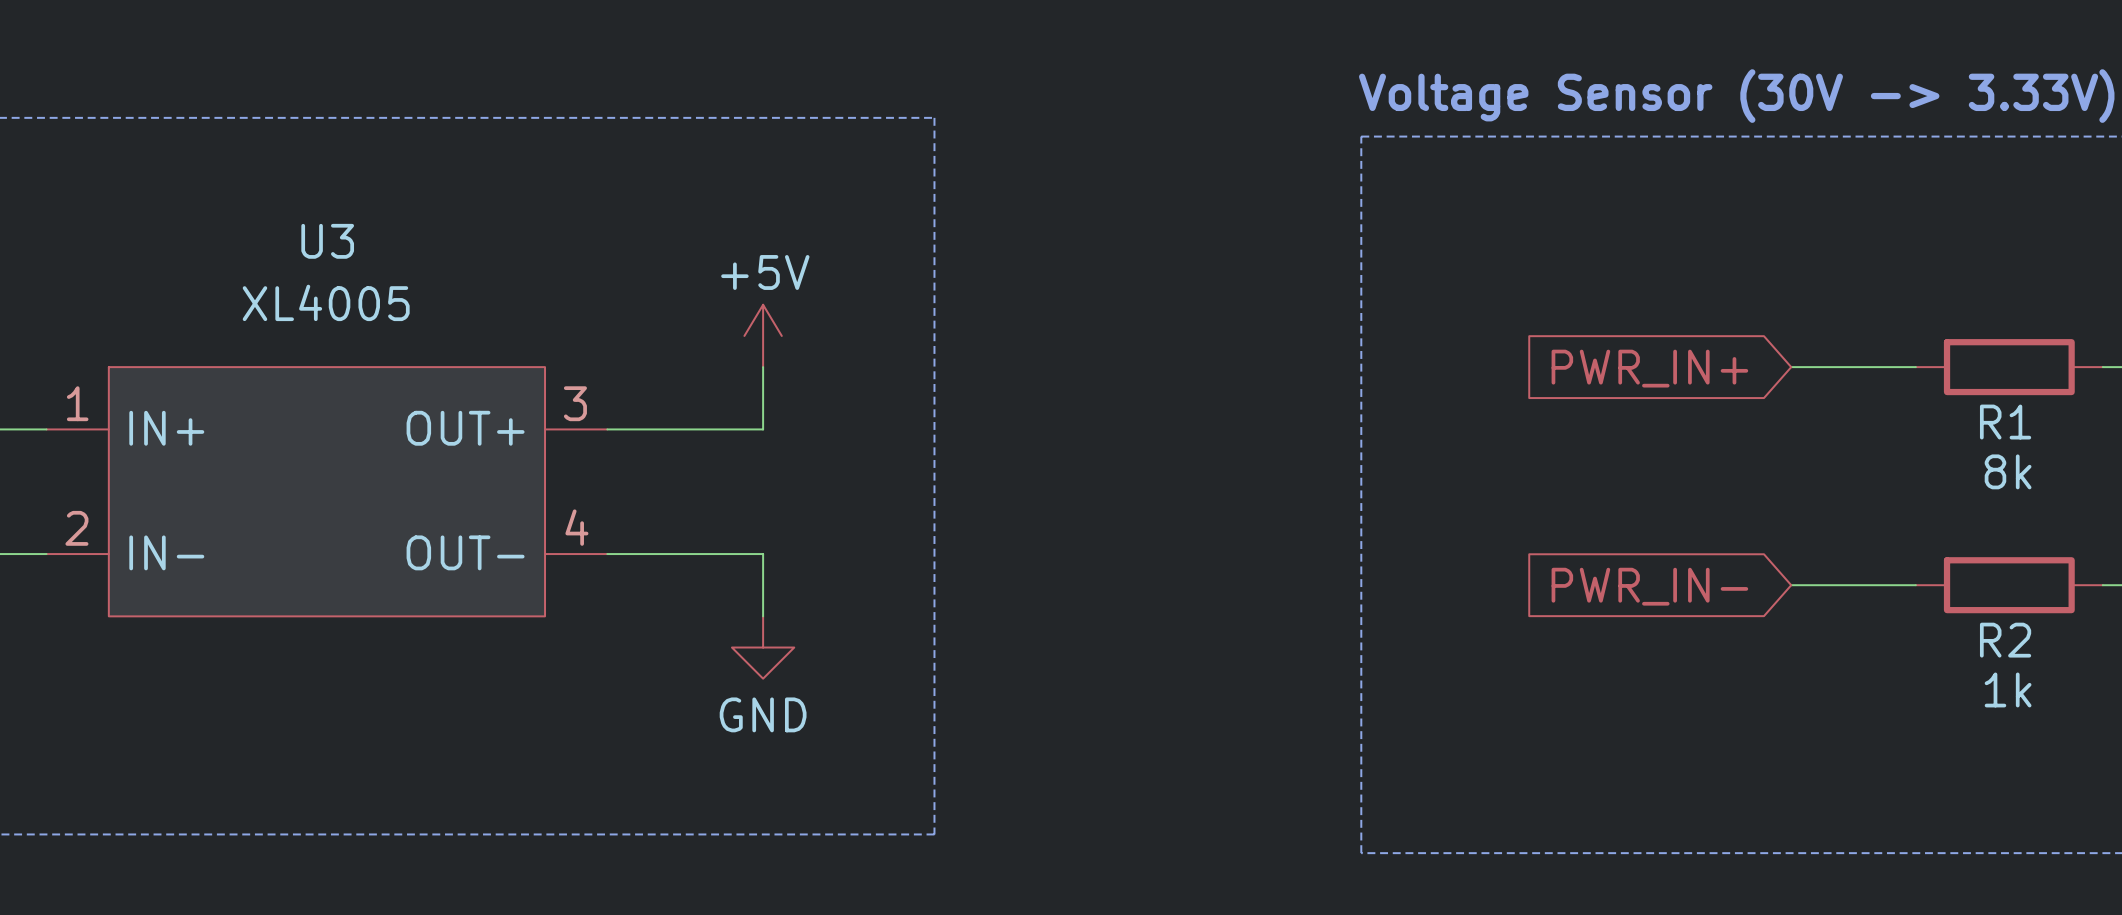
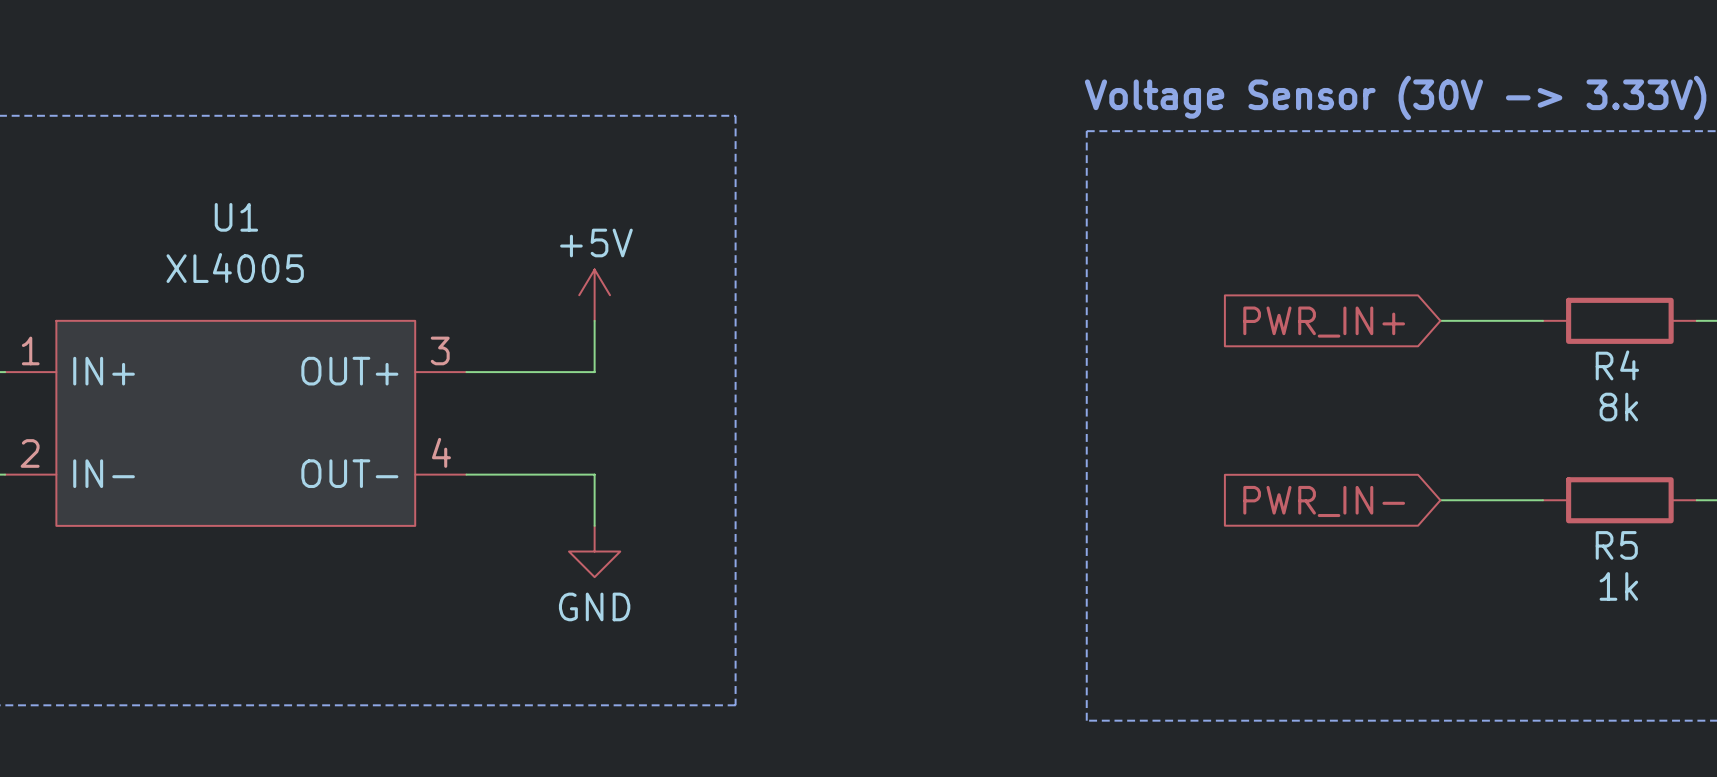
U3 name: U3 (327, 241) -> U1 (236, 217)
R1 name: R1 (2005, 422) -> R4 (1617, 365)
R2 name: R2 (2005, 640) -> R5 (1616, 545)

